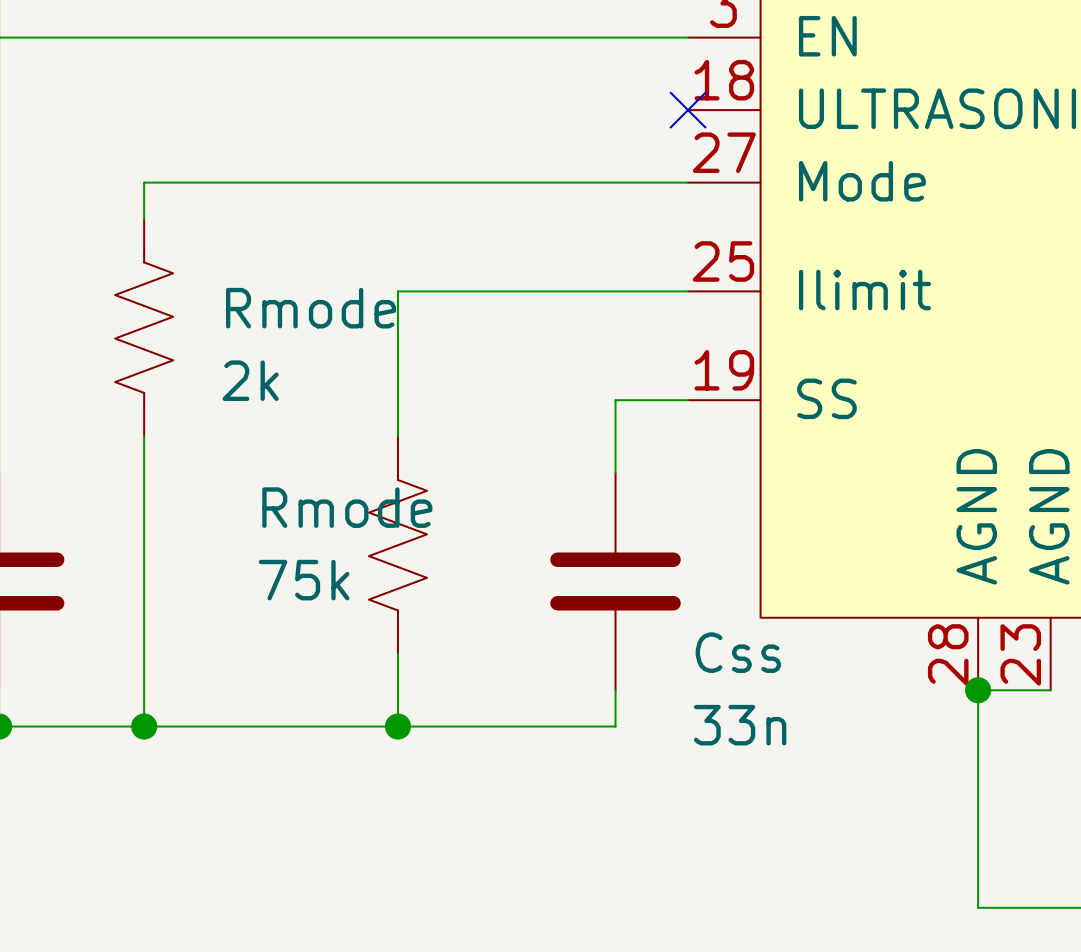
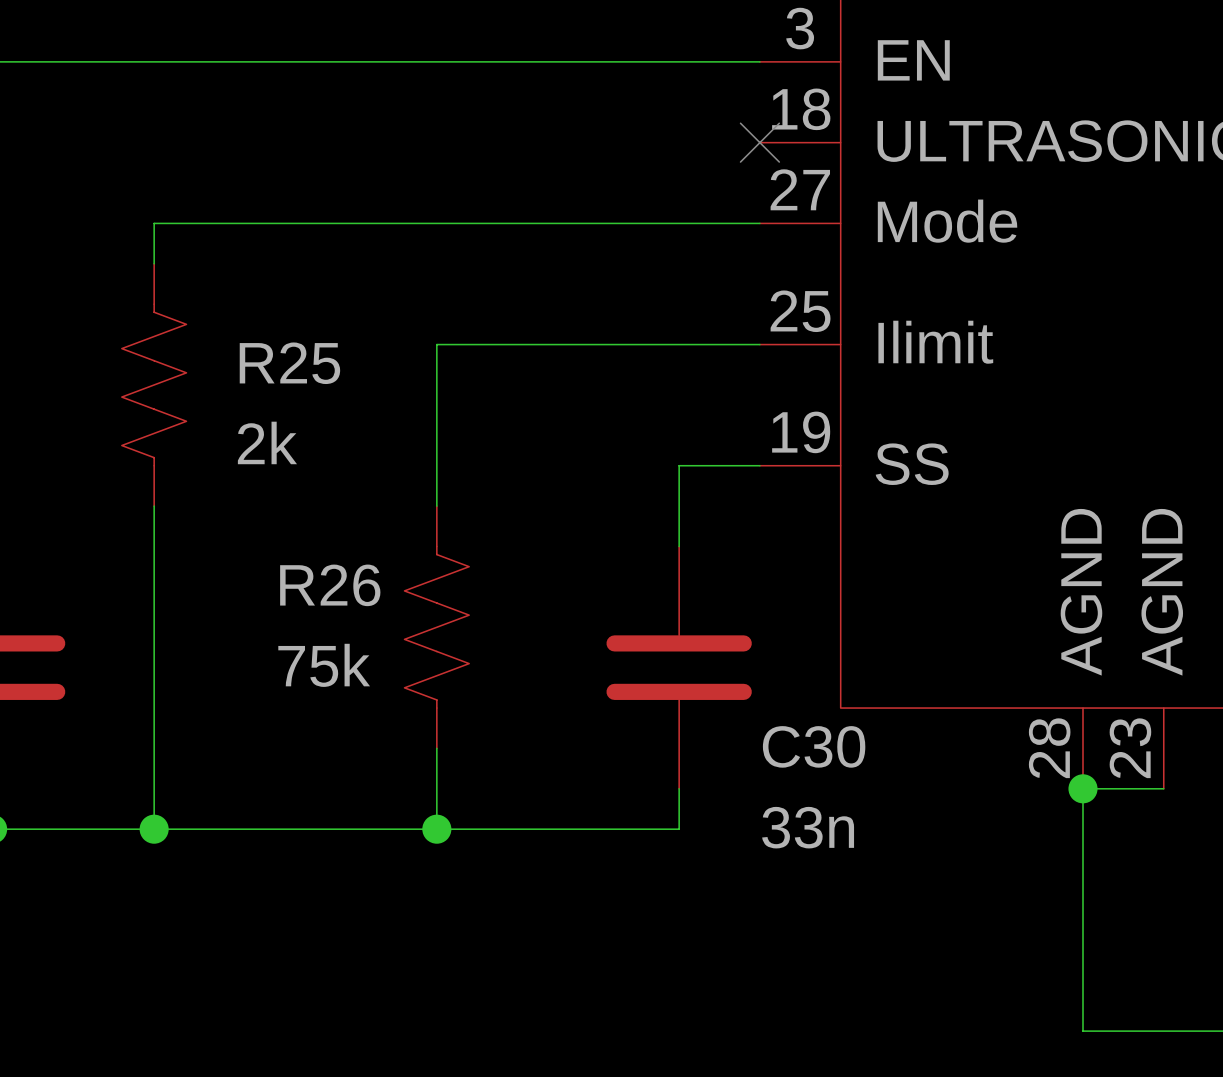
Rmode name: Rmode (311, 308) -> R25 (289, 363)
Rmode name: Rmode (347, 507) -> R26 (330, 585)
Css name: Css (738, 652) -> C30 (814, 746)

